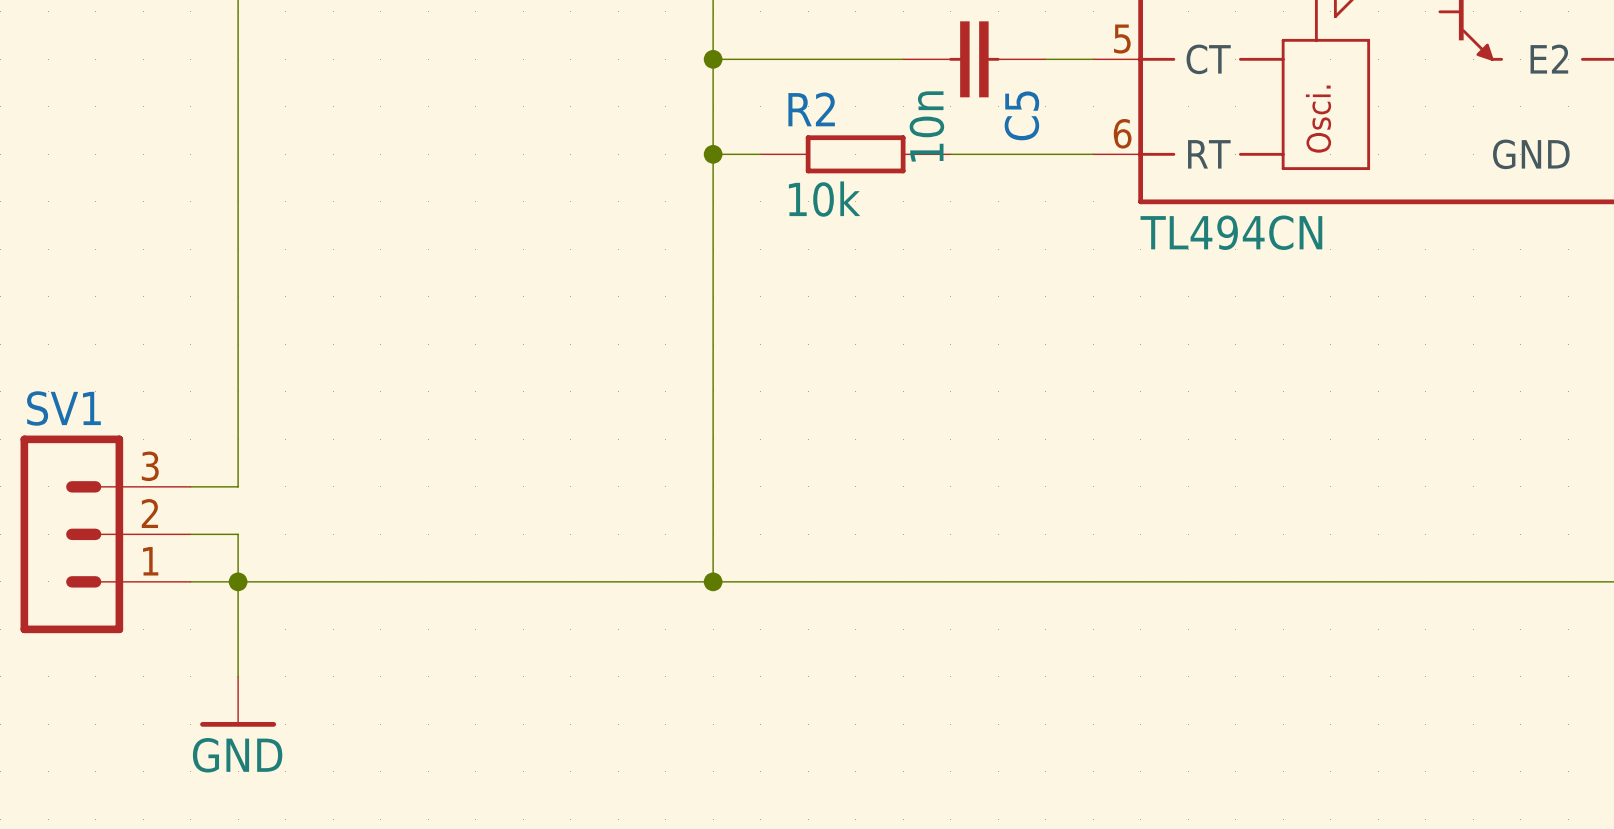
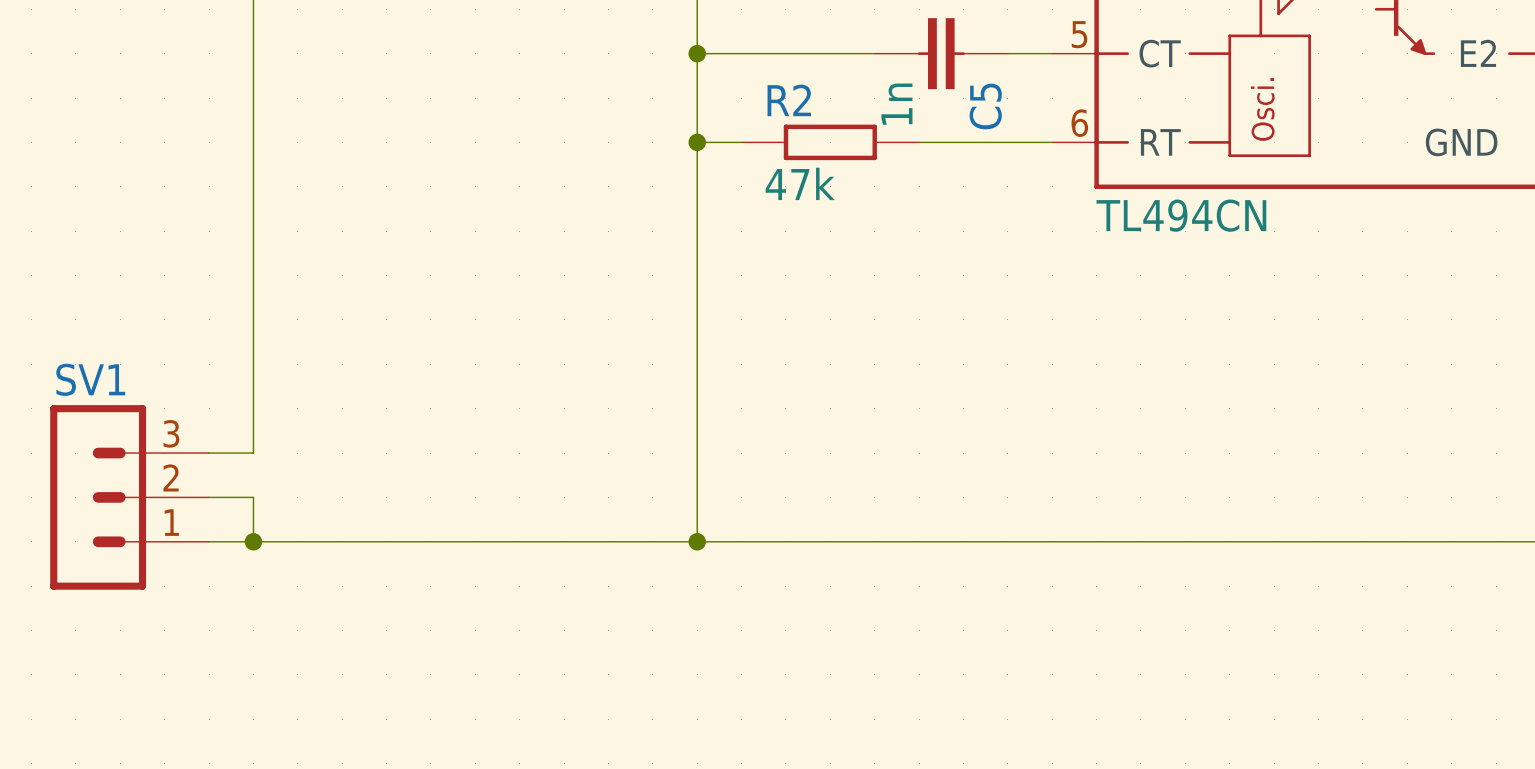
C5 value: 10n (926, 126) -> 1n (896, 104)
R2 value: 10k (824, 199) -> 47k (800, 183)
wire: (238, 581) (238, 676) -> none
power symbol: GND (238, 701) -> none

